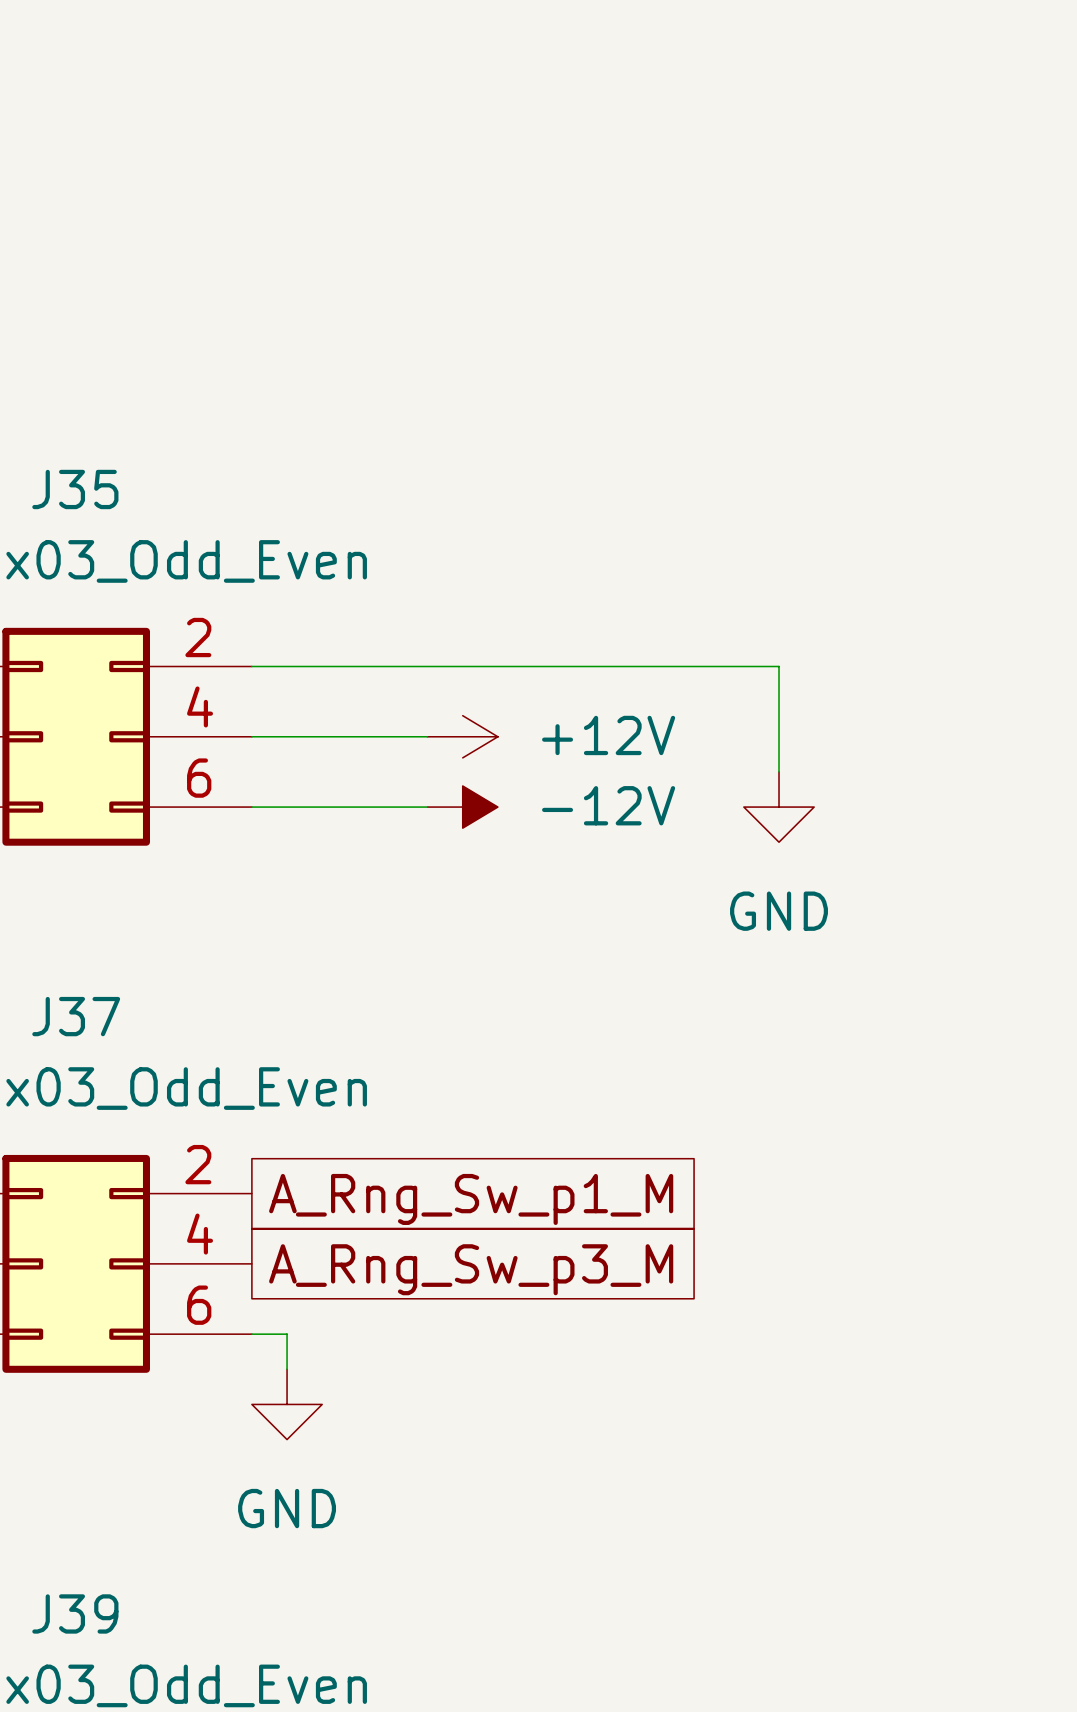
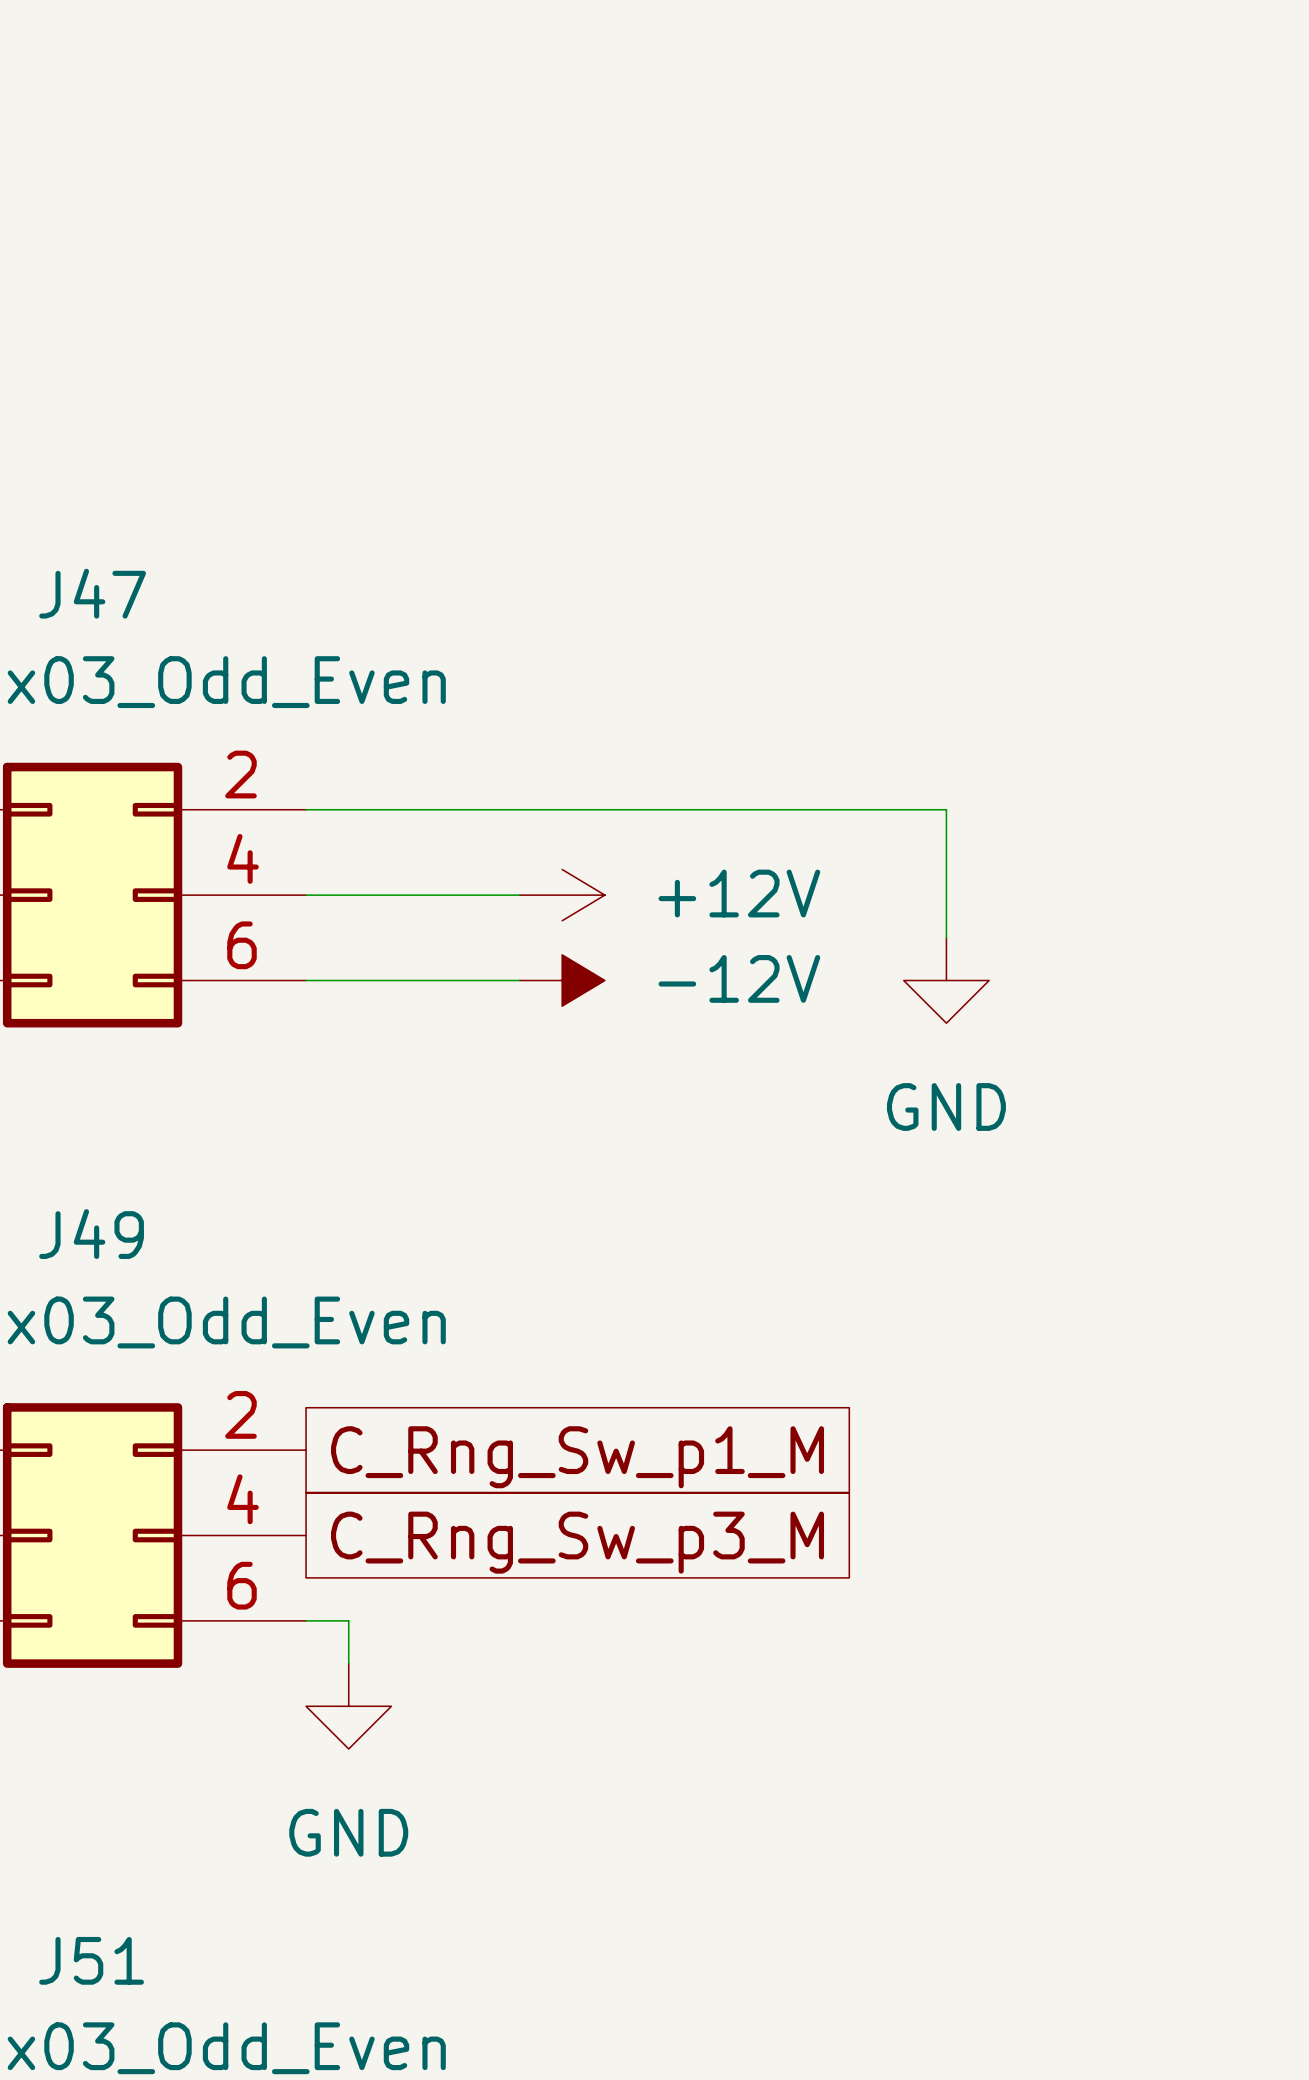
J35 name: J35 (75, 489) -> J47 (92, 593)
J37 name: J37 (76, 1016) -> J49 (91, 1234)
global label: A_Rng_Sw_p1_M (471, 1199) -> C_Rng_Sw_p1_M (577, 1457)
global label: A_Rng_Sw_p3_M (471, 1269) -> C_Rng_Sw_p3_M (577, 1542)
J39 name: J39 (75, 1613) -> J51 (91, 1960)

